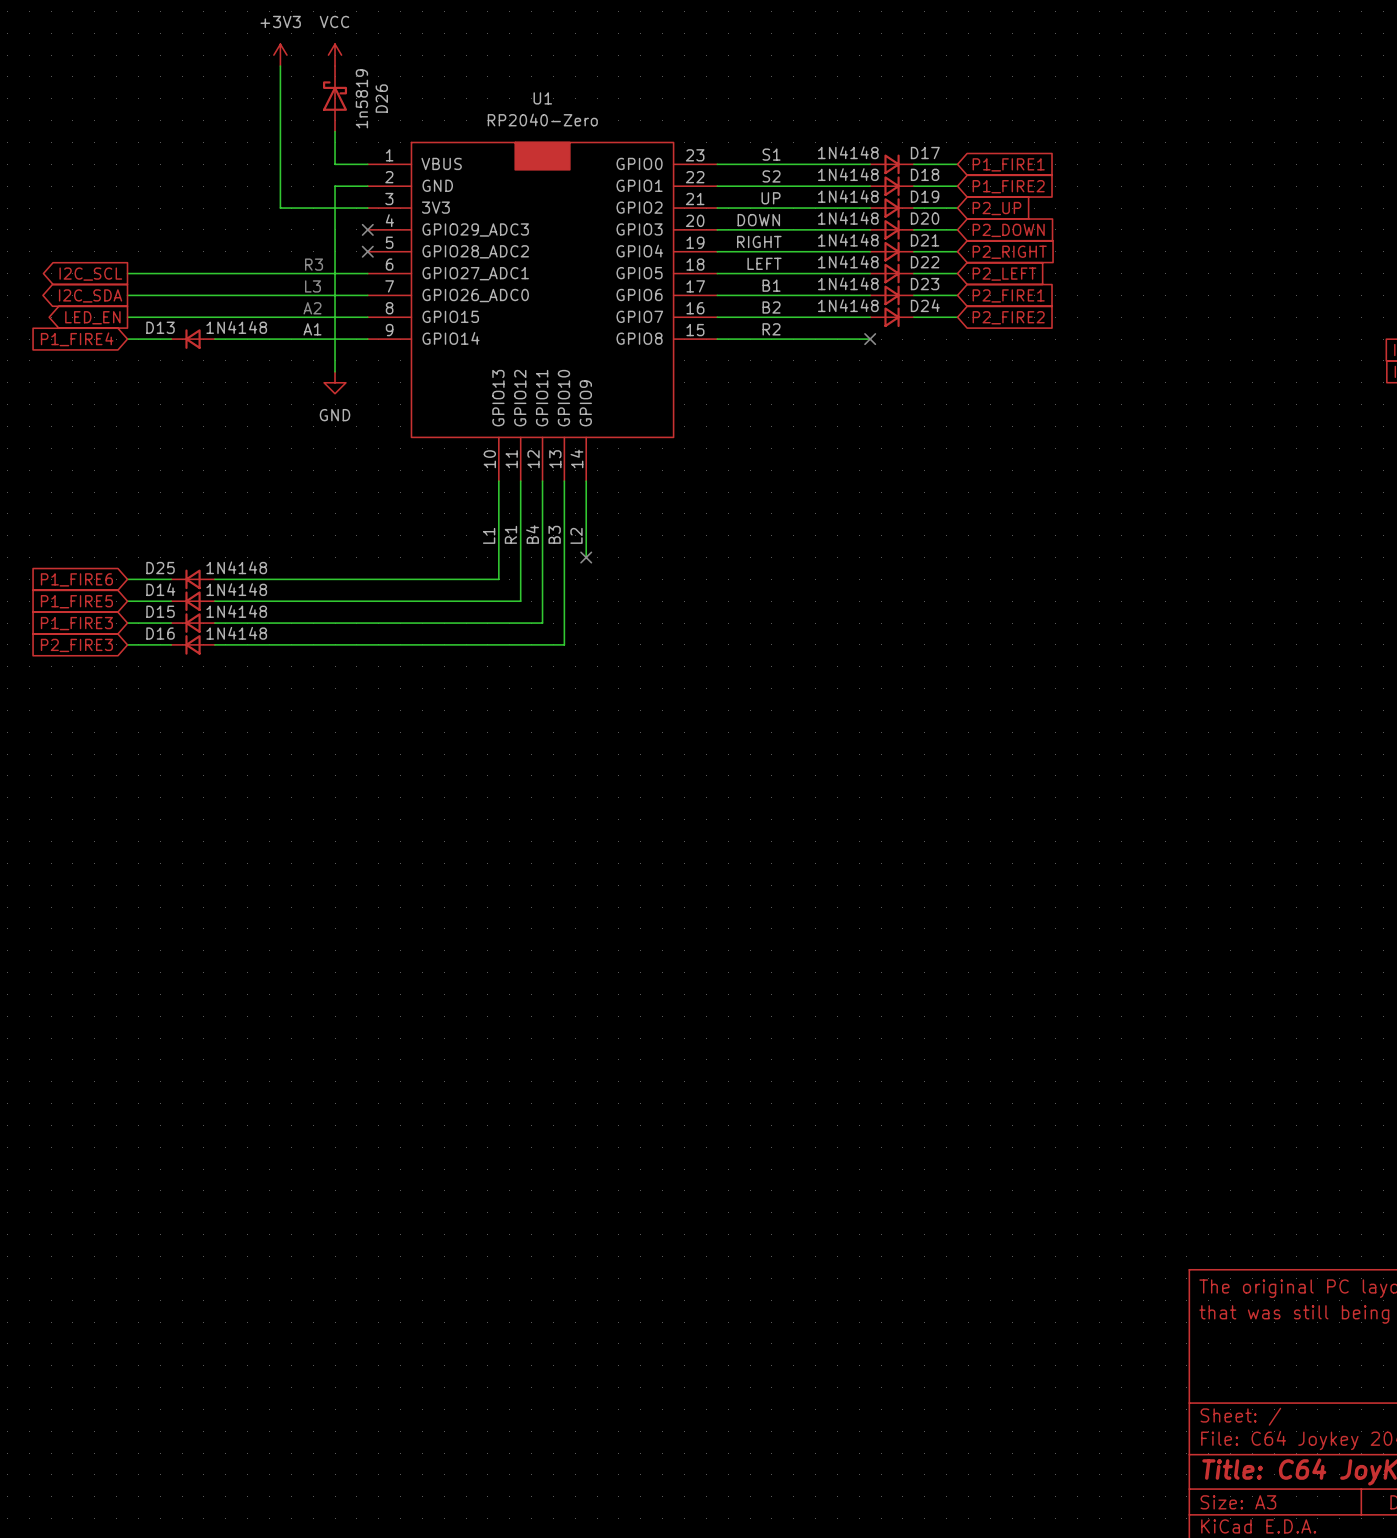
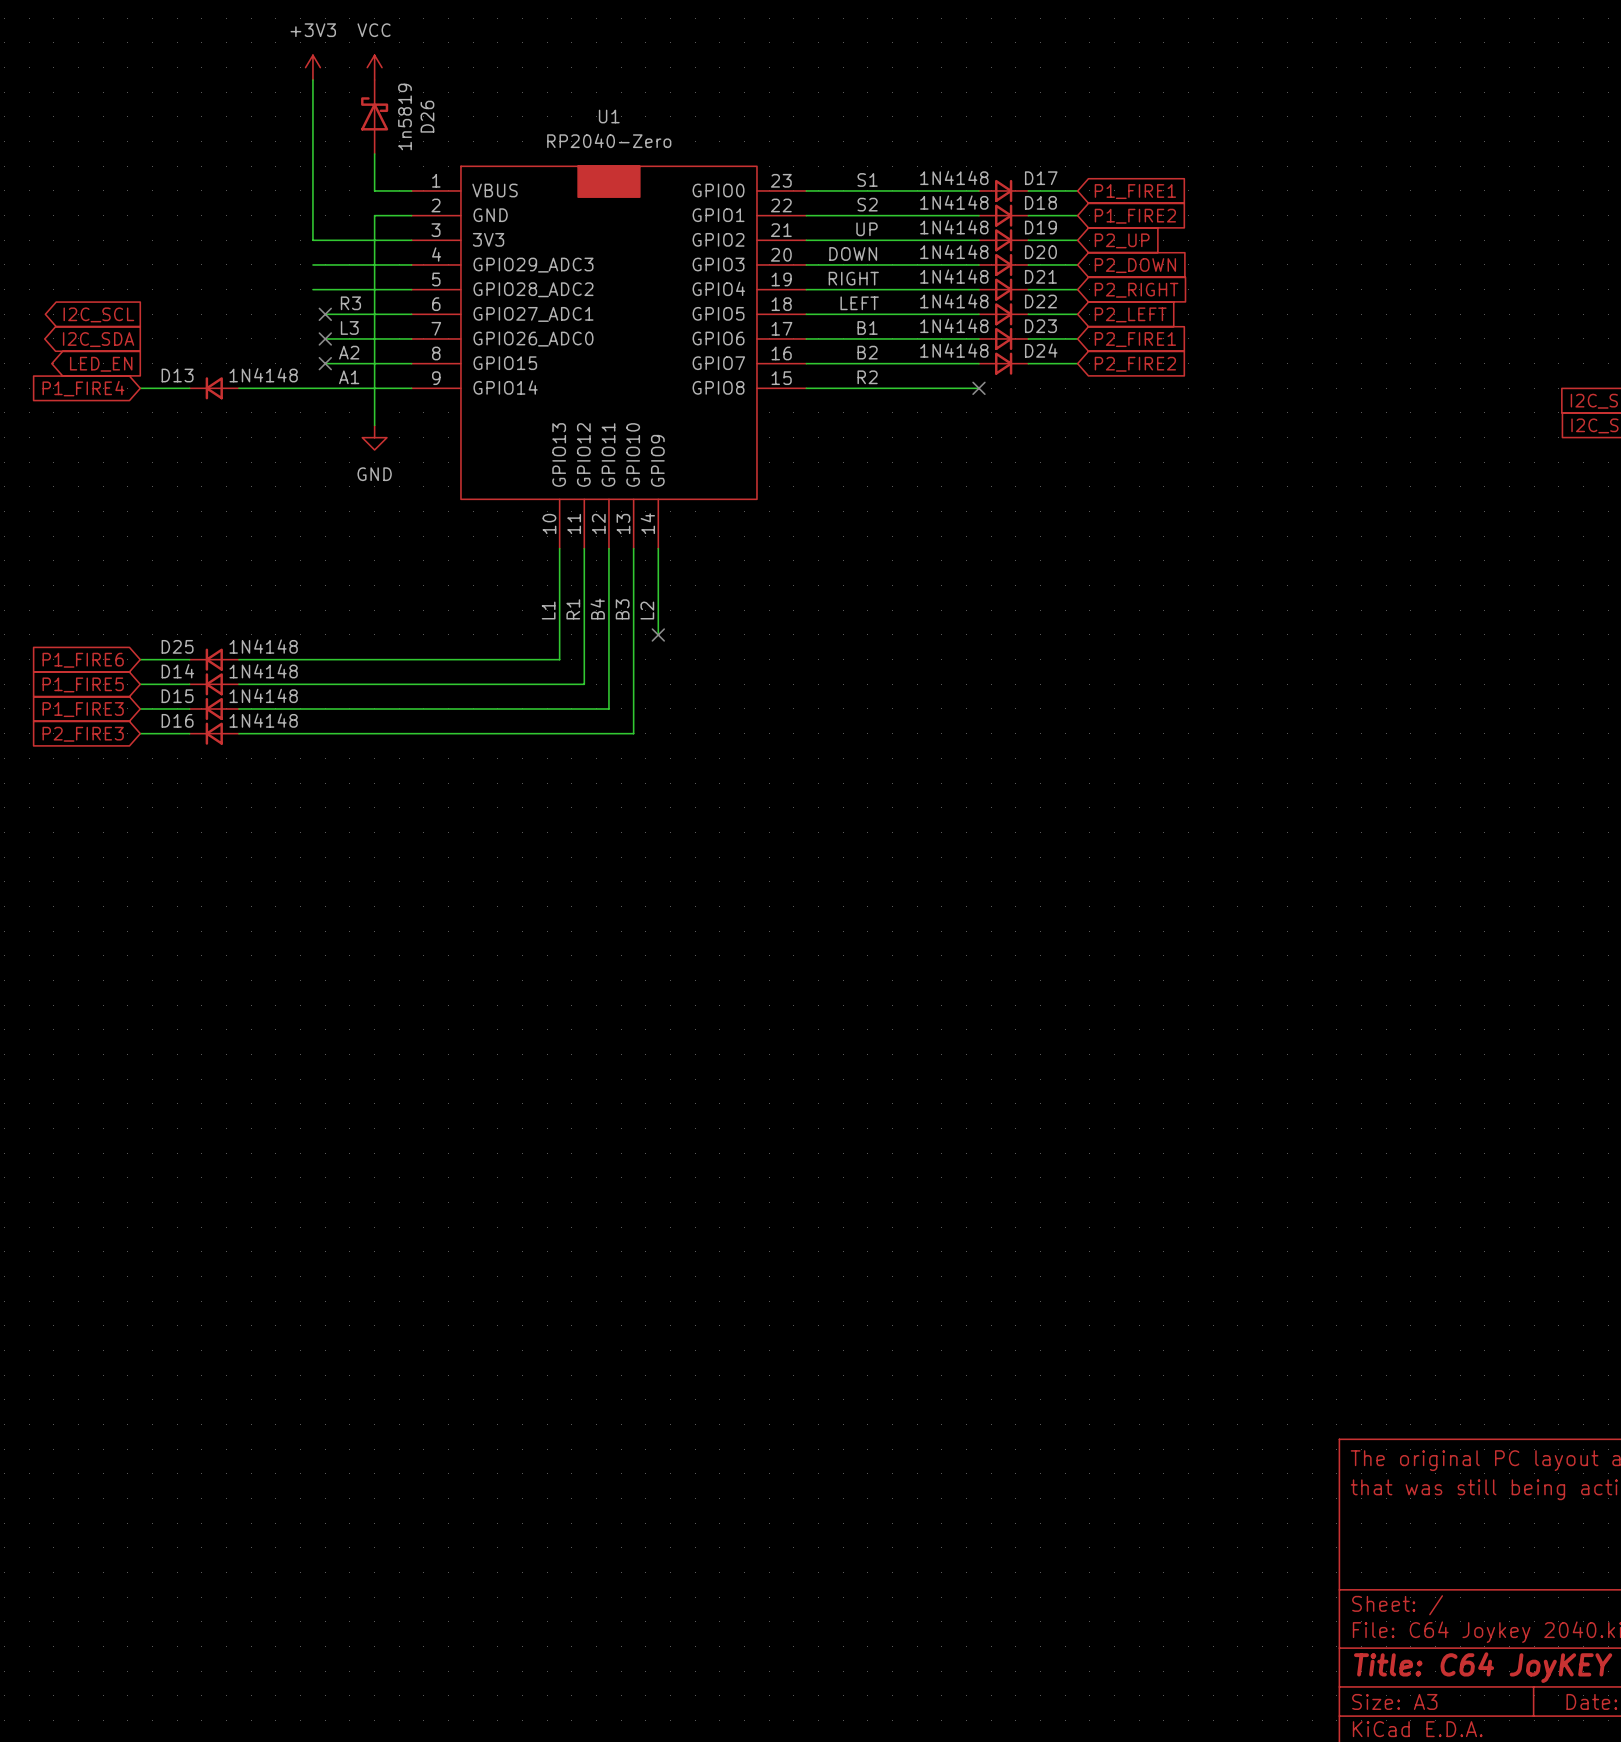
wire: none -> (312, 264) (411, 264)
no-connect mark: (367, 229) -> none
wire: none -> (312, 289) (411, 289)
no-connect mark: (367, 251) -> none
label: none -> R3 (350, 303)
text: R3 (314, 264) -> none
wire: (127, 273) (291, 273) -> none
no-connect mark: none -> (325, 314)
label: none -> L3 (349, 327)
text: L3 (312, 286) -> none
wire: (127, 295) (291, 295) -> none
no-connect mark: none -> (325, 338)
label: none -> A2 (349, 352)
text: A2 (312, 308) -> none
wire: (127, 317) (291, 317) -> none
no-connect mark: none -> (325, 363)

